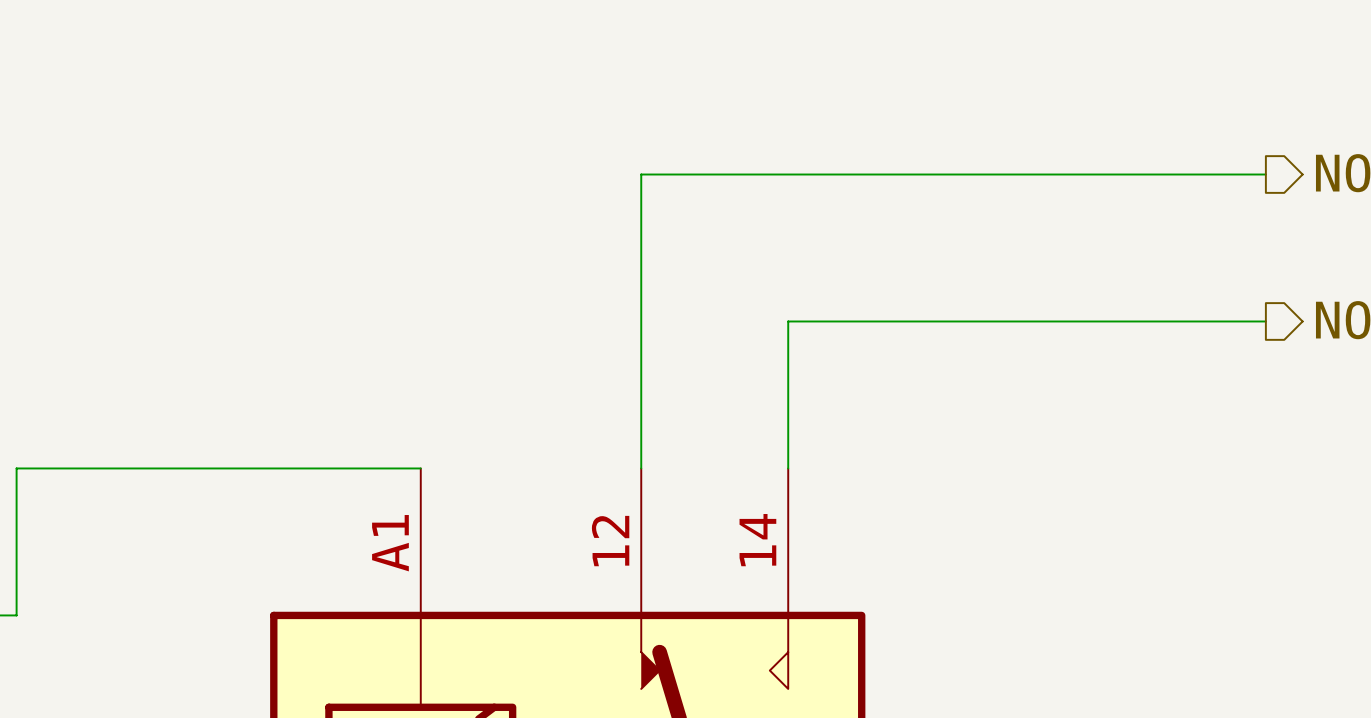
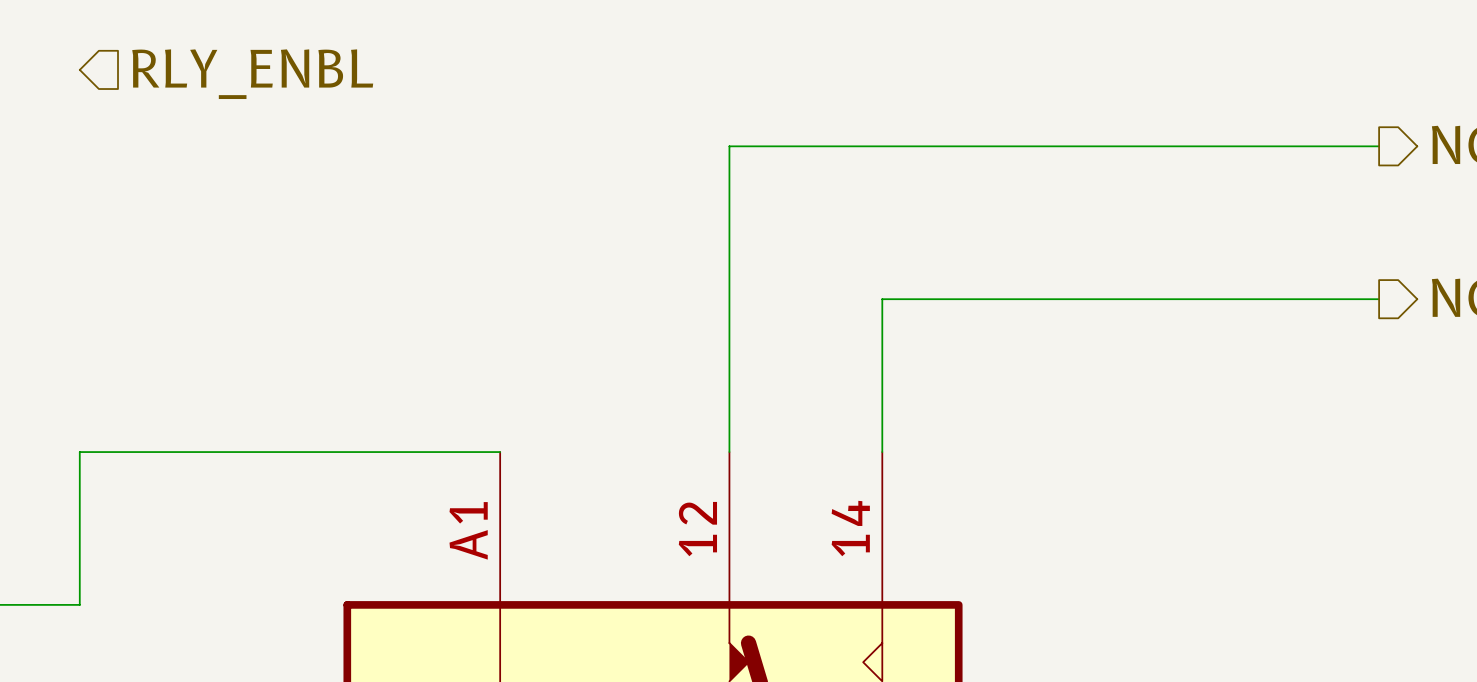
hierarchical label: none -> RLY_ENBL (252, 74)

